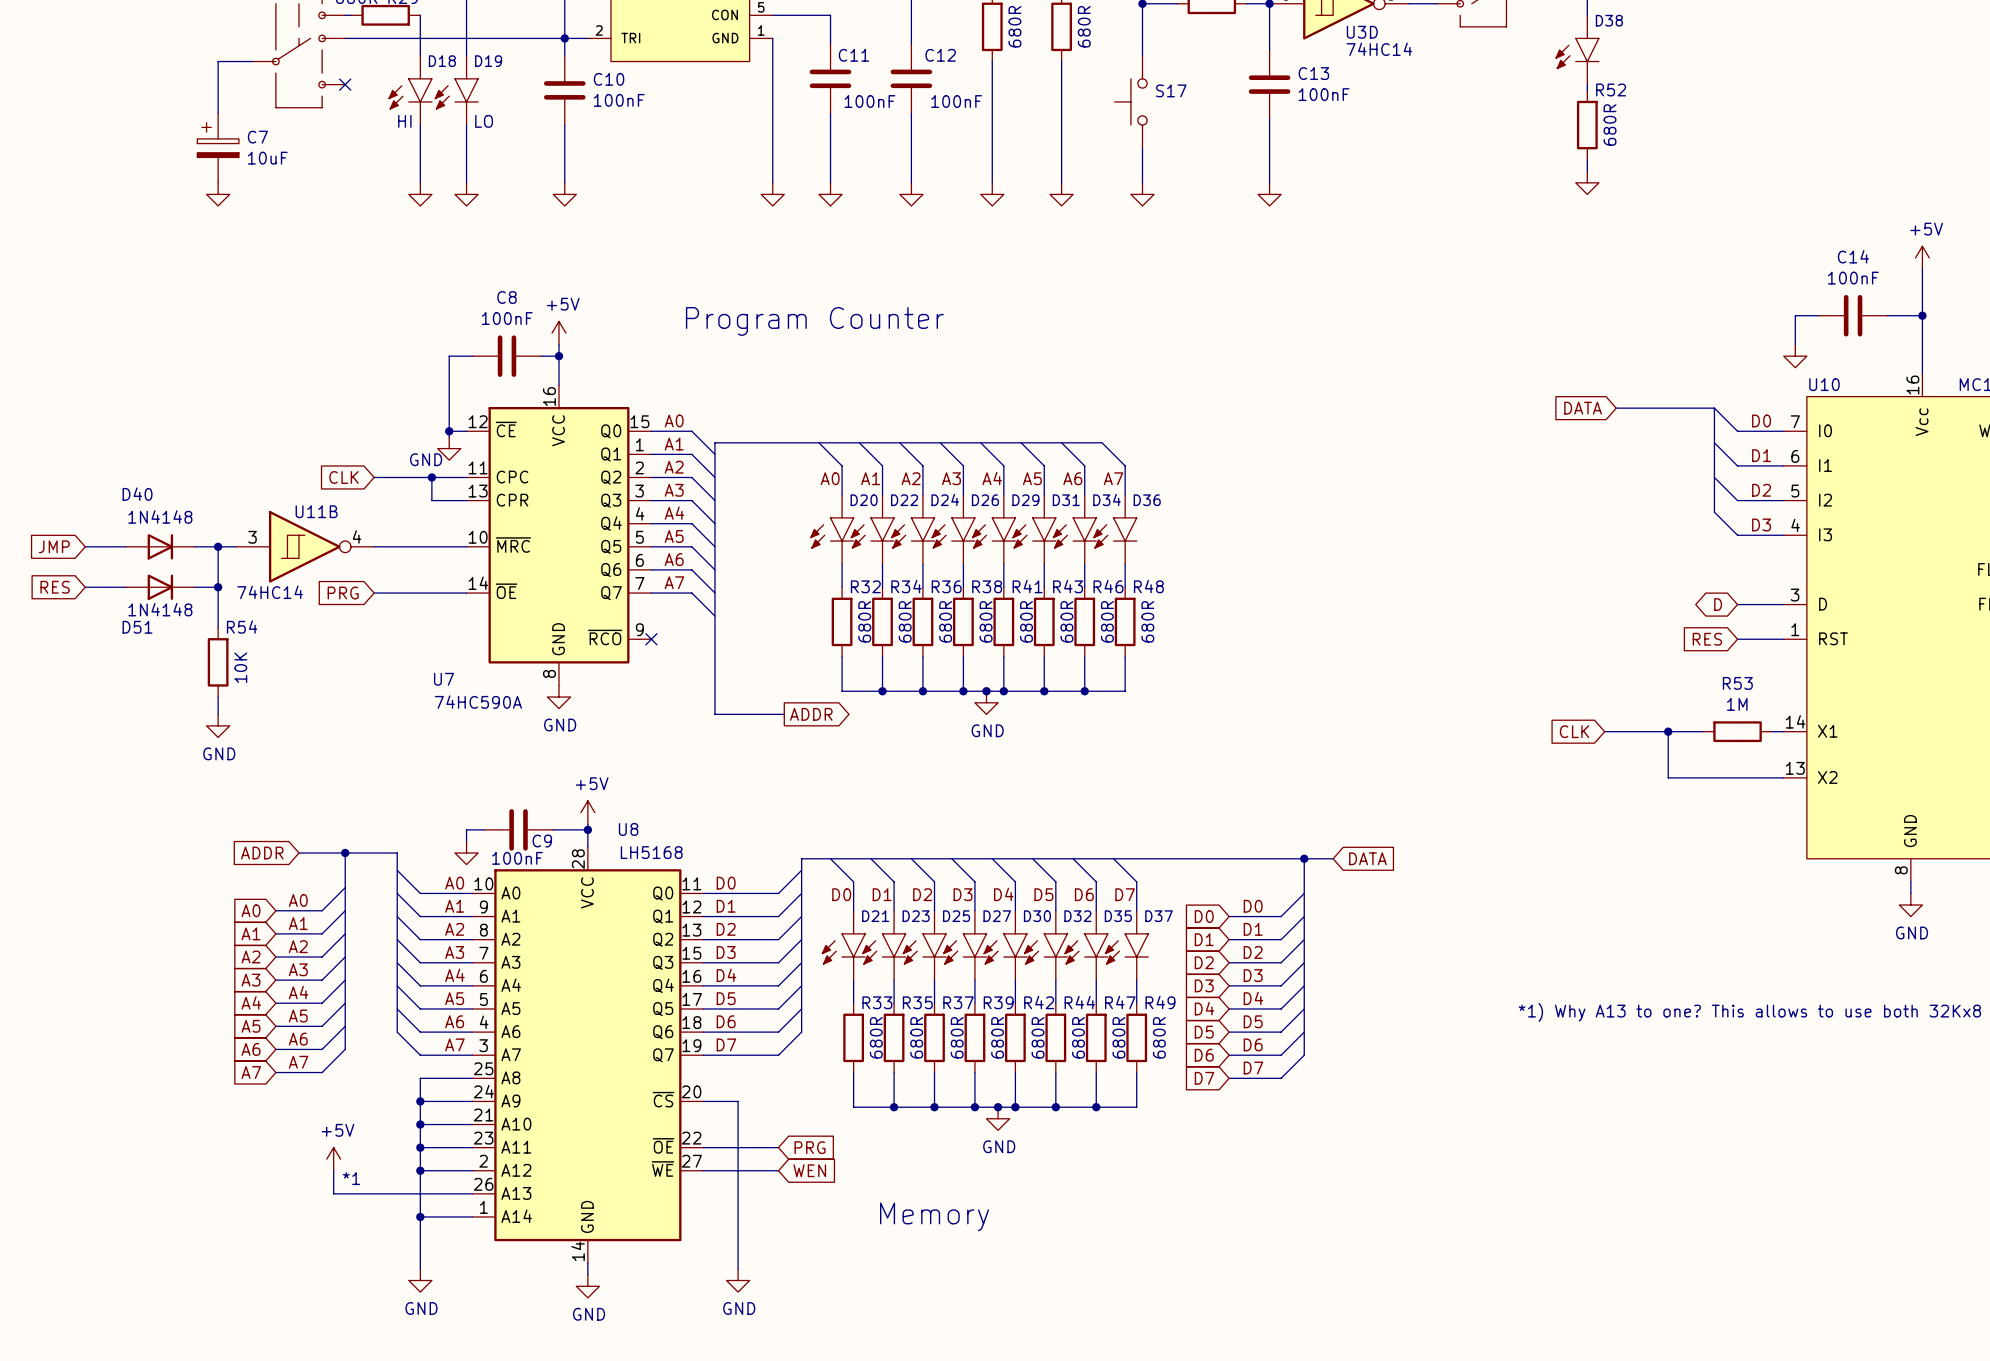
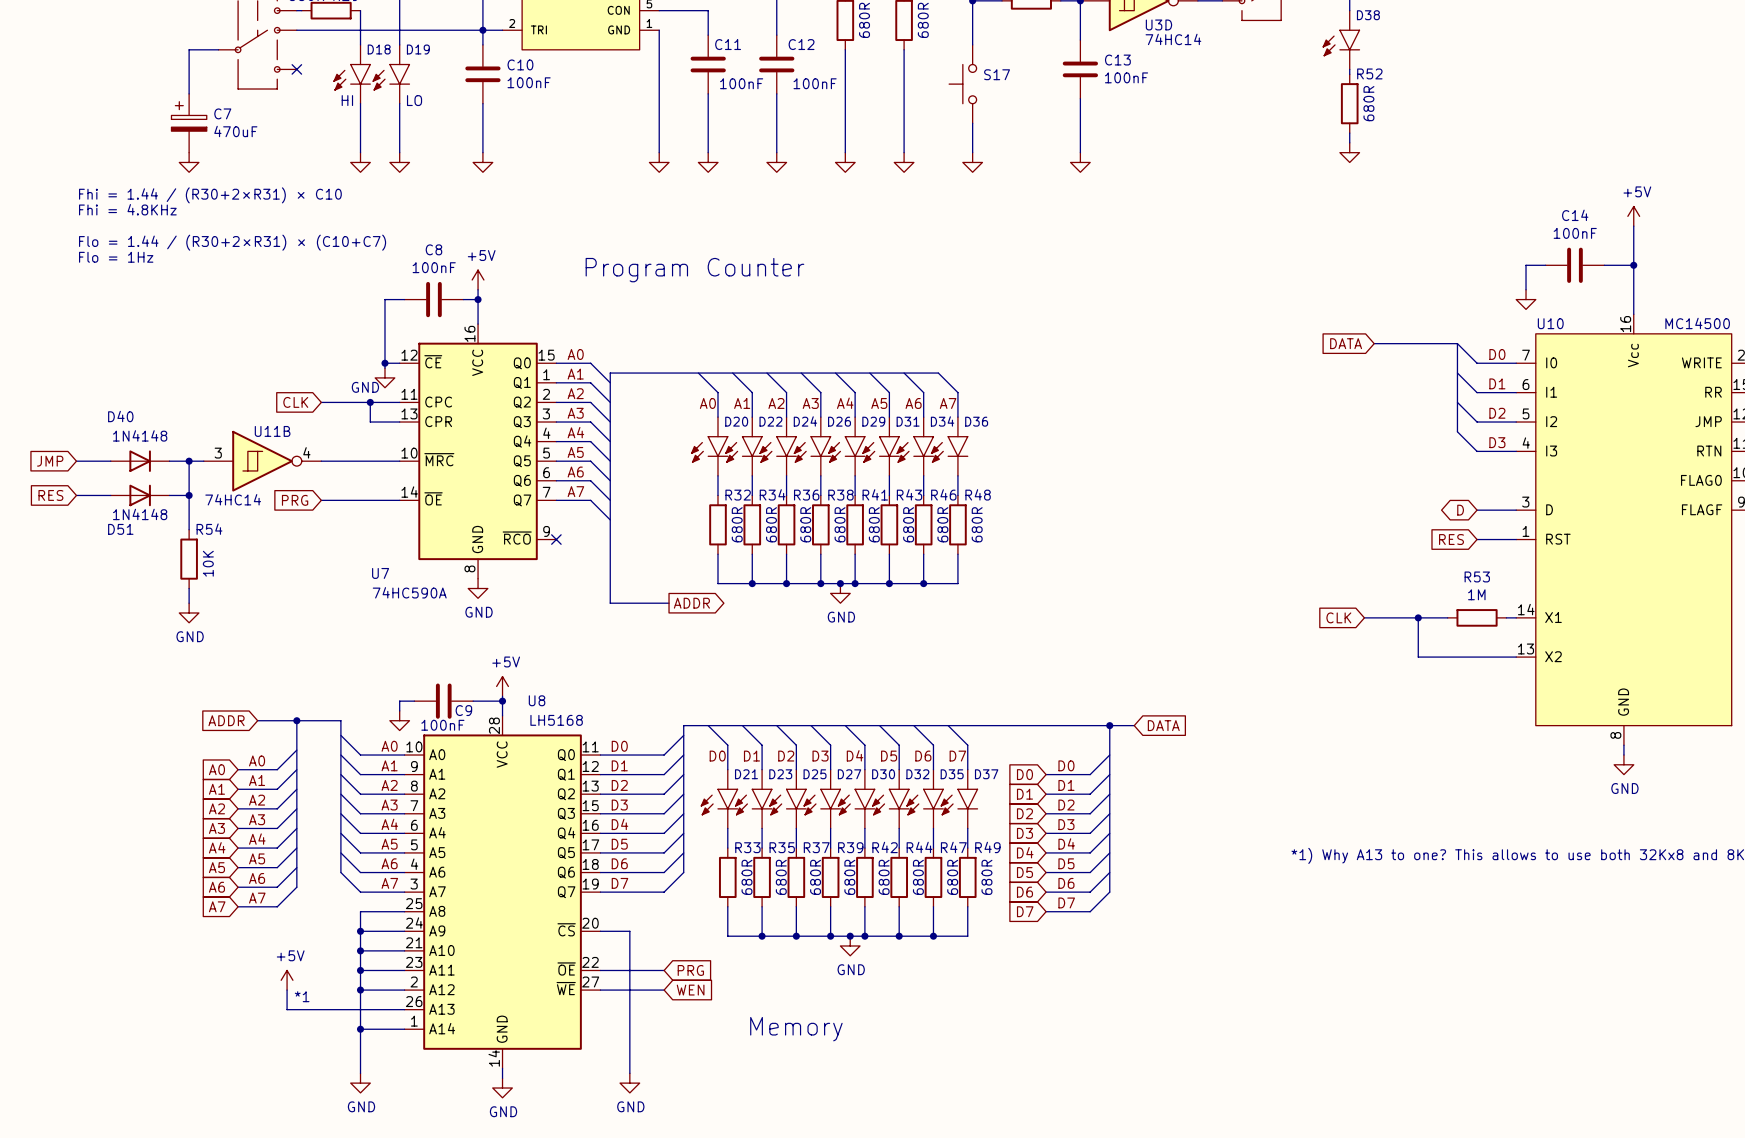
C7 value: 10uF (267, 158) -> 470uF (235, 131)
text: none -> Fhi = 1.44 / (R30+2×R31) × C10 (210, 195)
text: none -> Fhi = 4.8KHz (127, 209)
text: none -> Flo = 1.44 / (R30+2×R31) × (C10+C7) (232, 242)
text: none -> Flo = 1Hz (116, 257)

